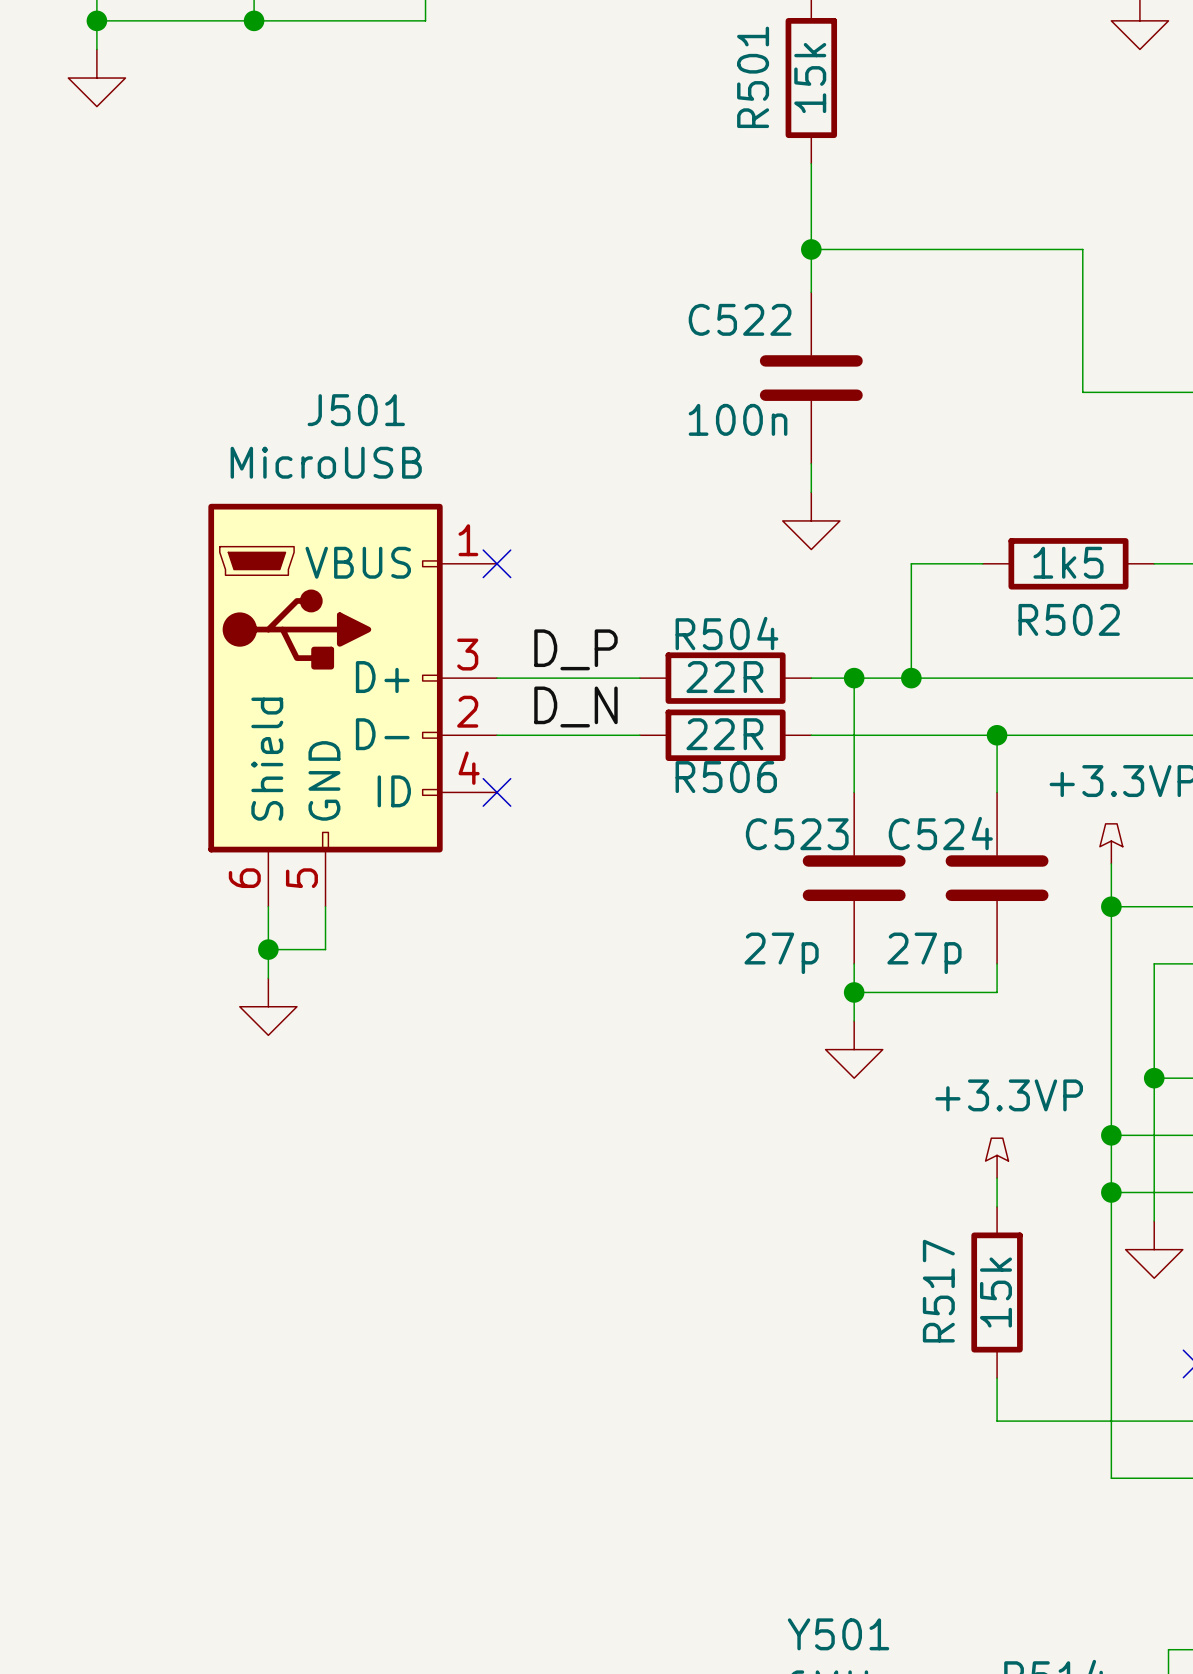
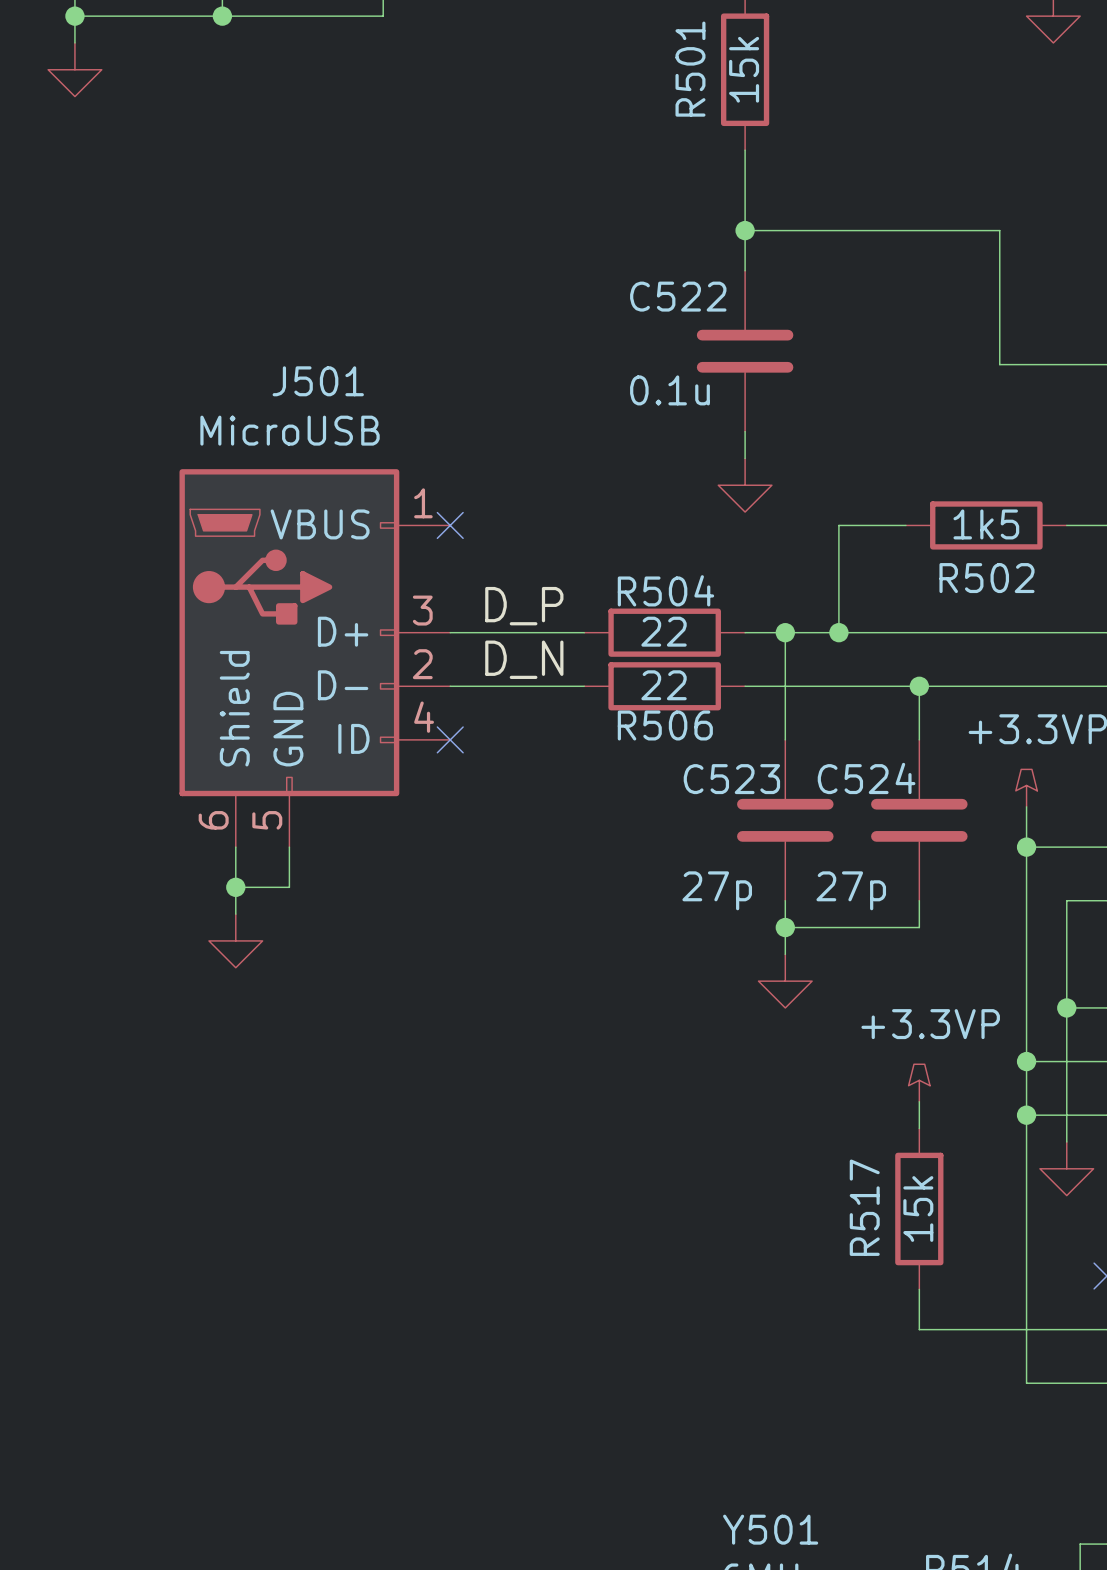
C522 value: 100n (738, 419) -> 0.1u (669, 390)
R504 value: 22R (724, 677) -> 22 (664, 631)
R506 value: 22R (724, 734) -> 22 (664, 685)

